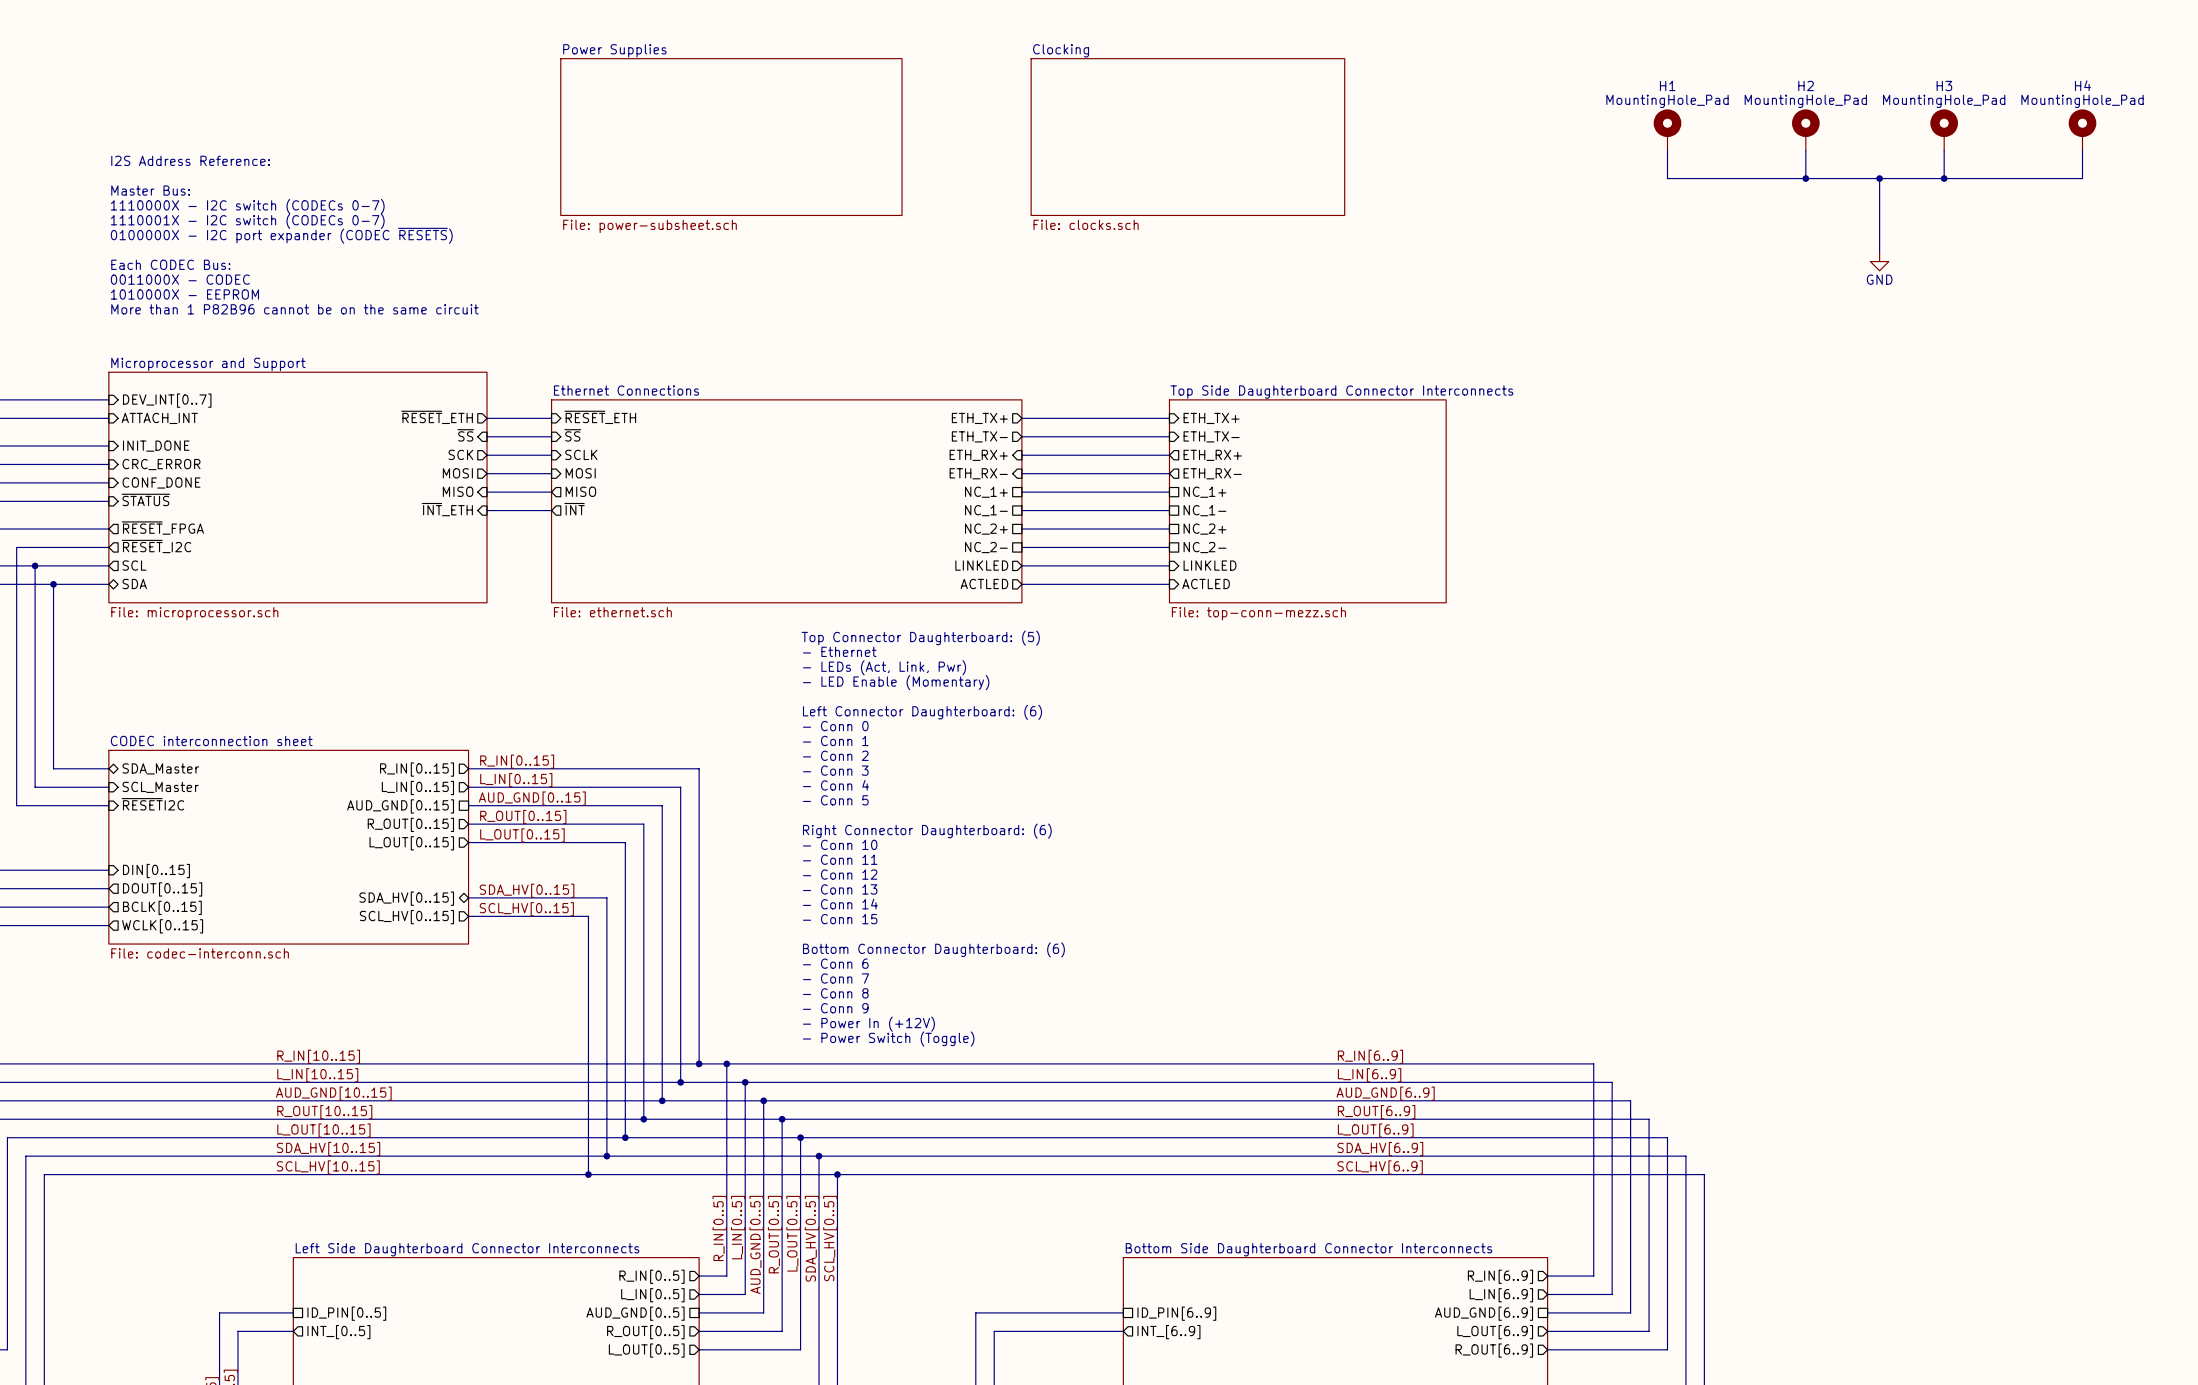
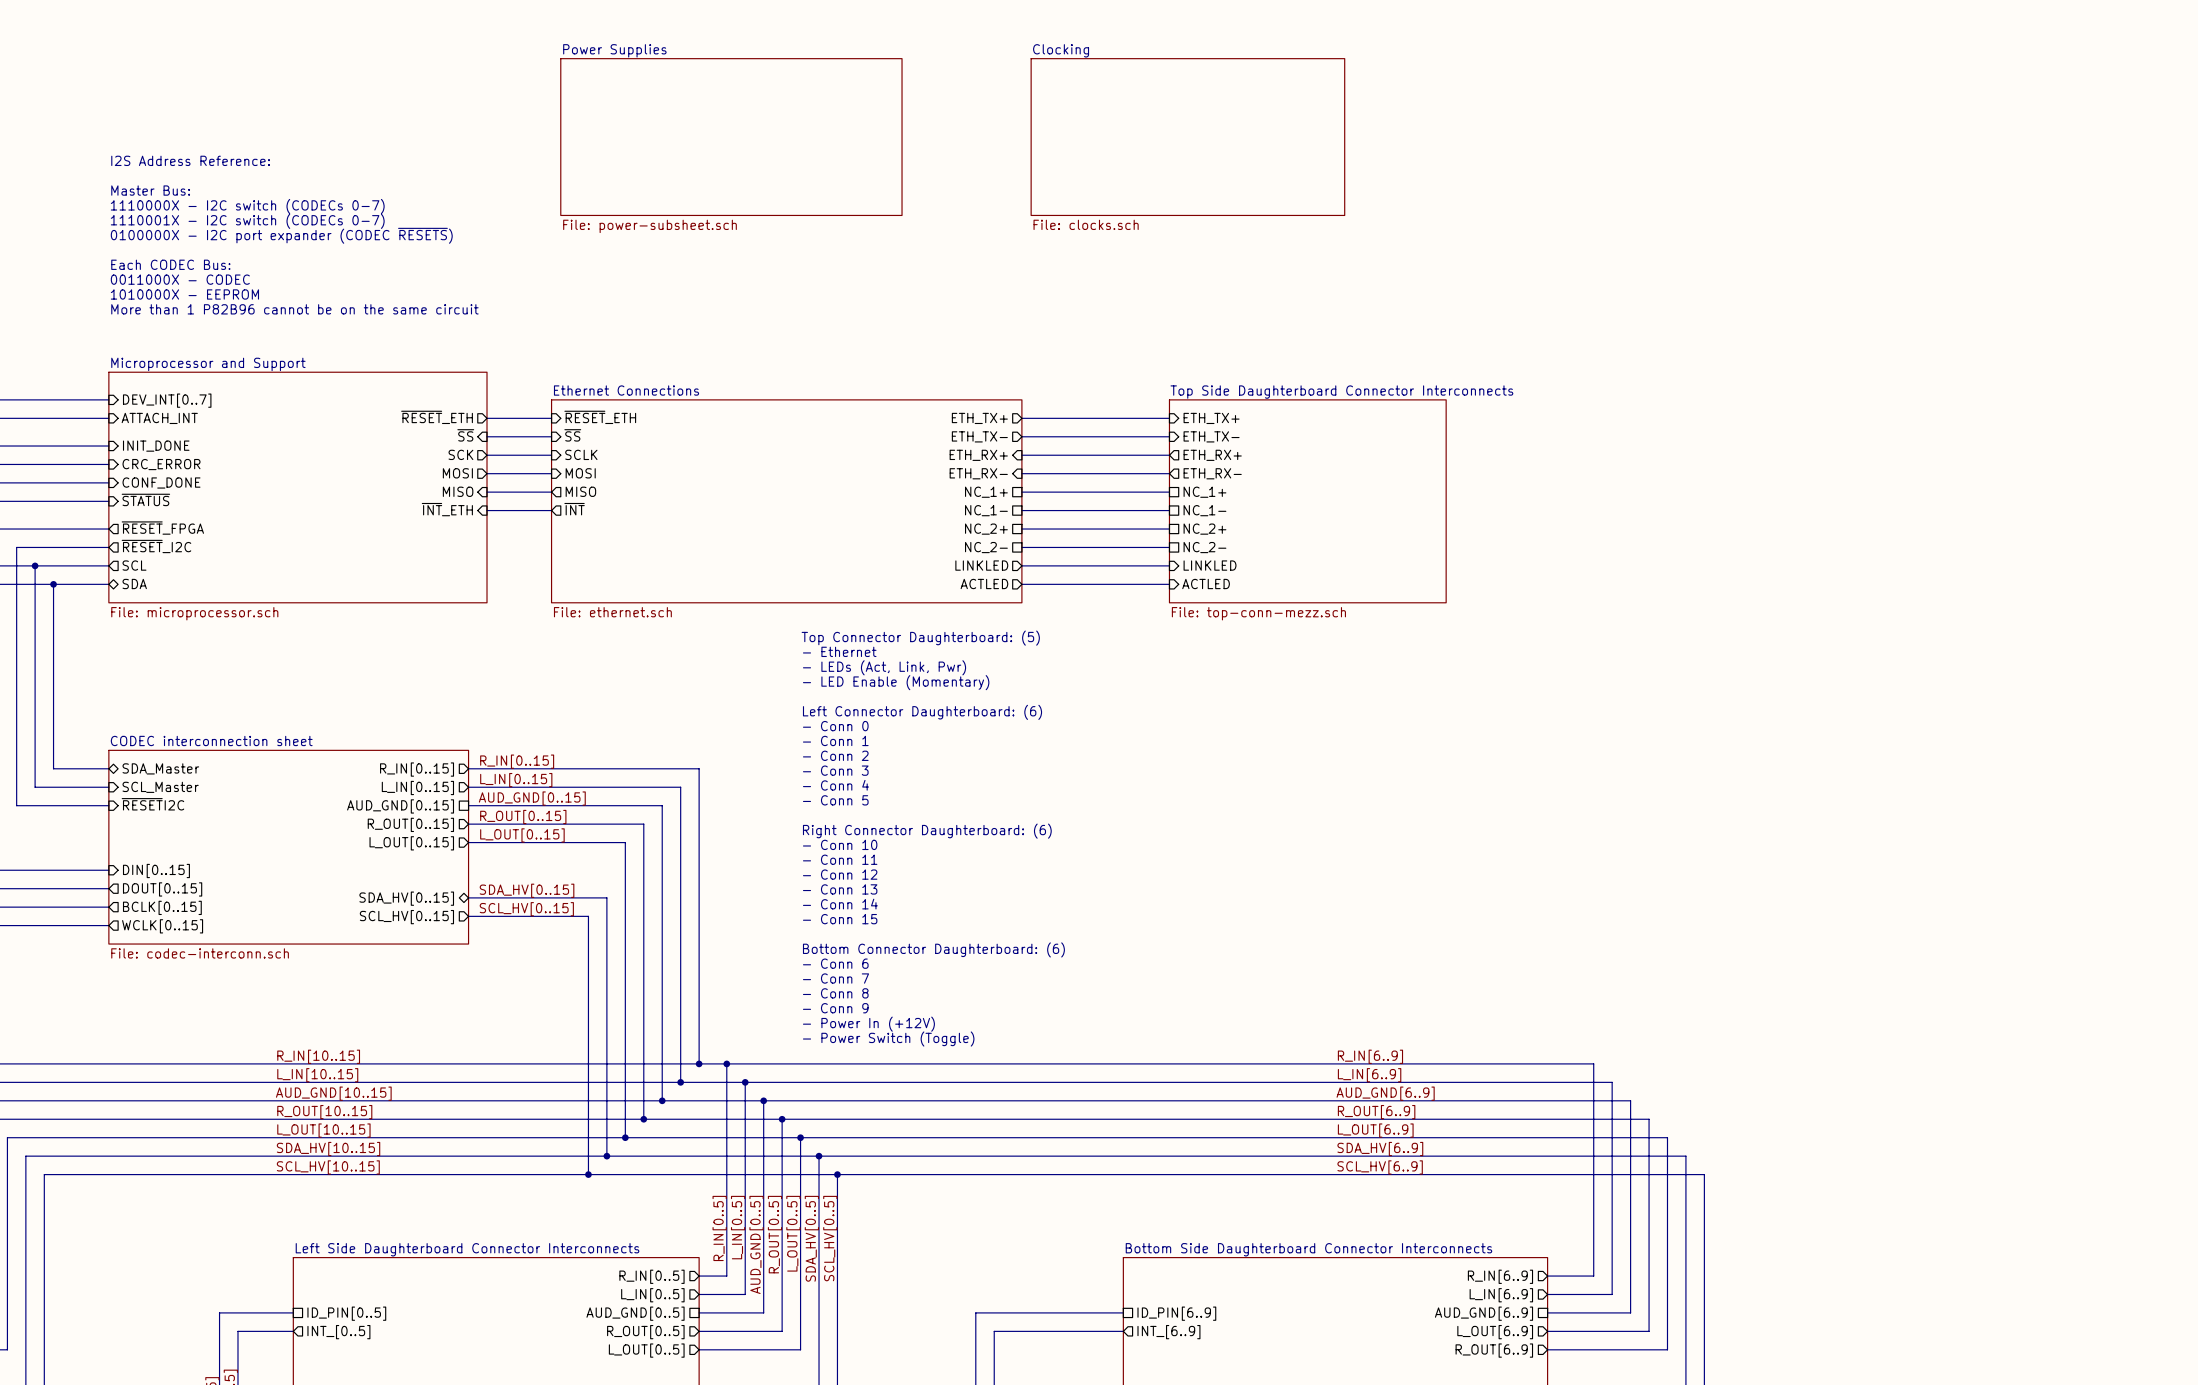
H1: MountingHole_Pad (1667, 130) -> none
H2: MountingHole_Pad (1805, 130) -> none
H3: MountingHole_Pad (1944, 130) -> none
H4: MountingHole_Pad (2082, 130) -> none
wire: (1667, 150) (1667, 178) (2082, 178) (2082, 150) -> none
wire: (1805, 150) (1805, 178) -> none
wire: (1944, 150) (1944, 178) -> none
junction: (1805, 178) -> none
wire: (1879, 178) (1879, 252) -> none
junction: (1879, 178) -> none
junction: (1944, 178) -> none
power symbol: GND (1879, 261) -> none

